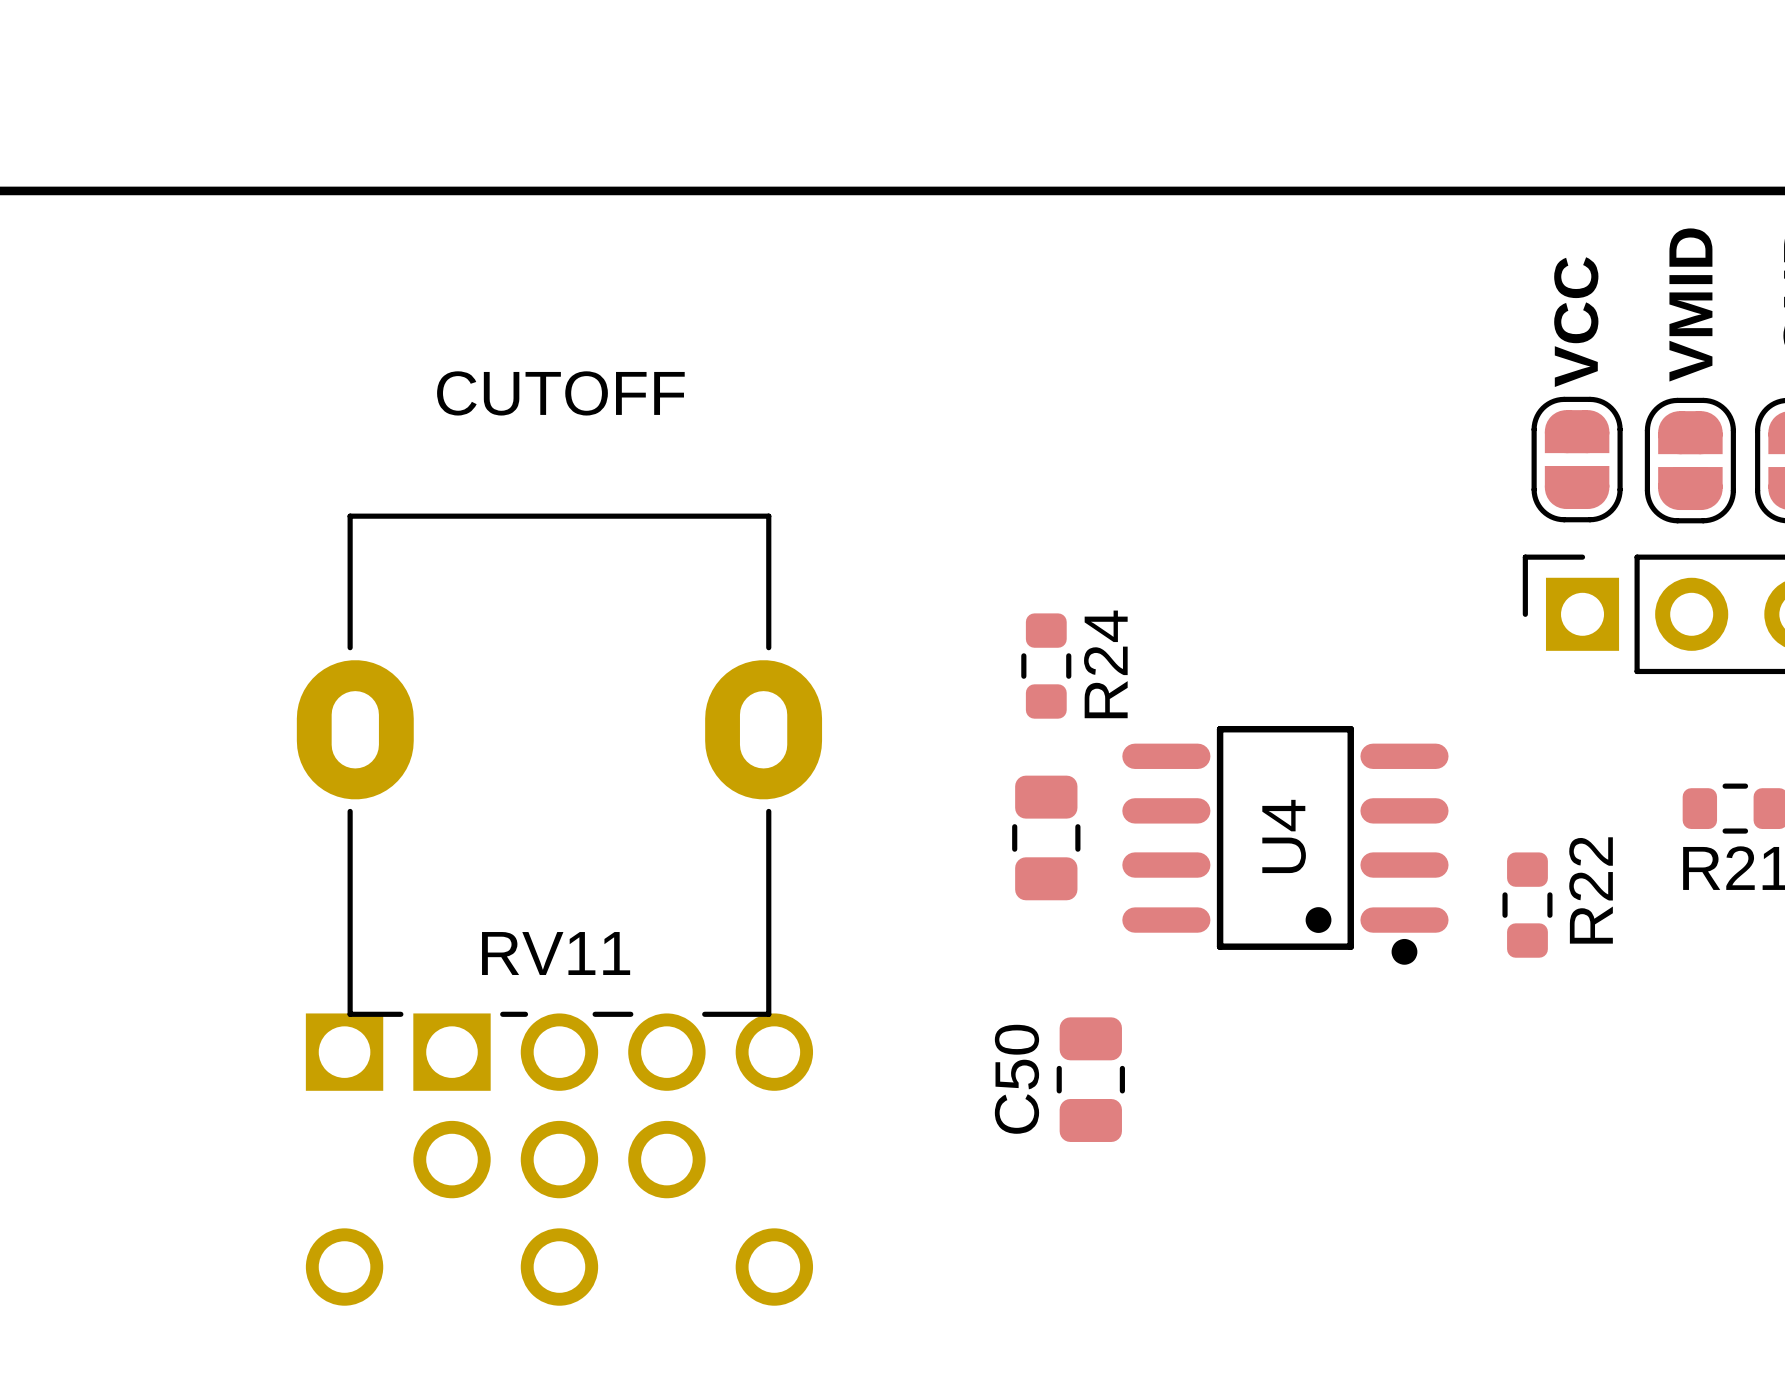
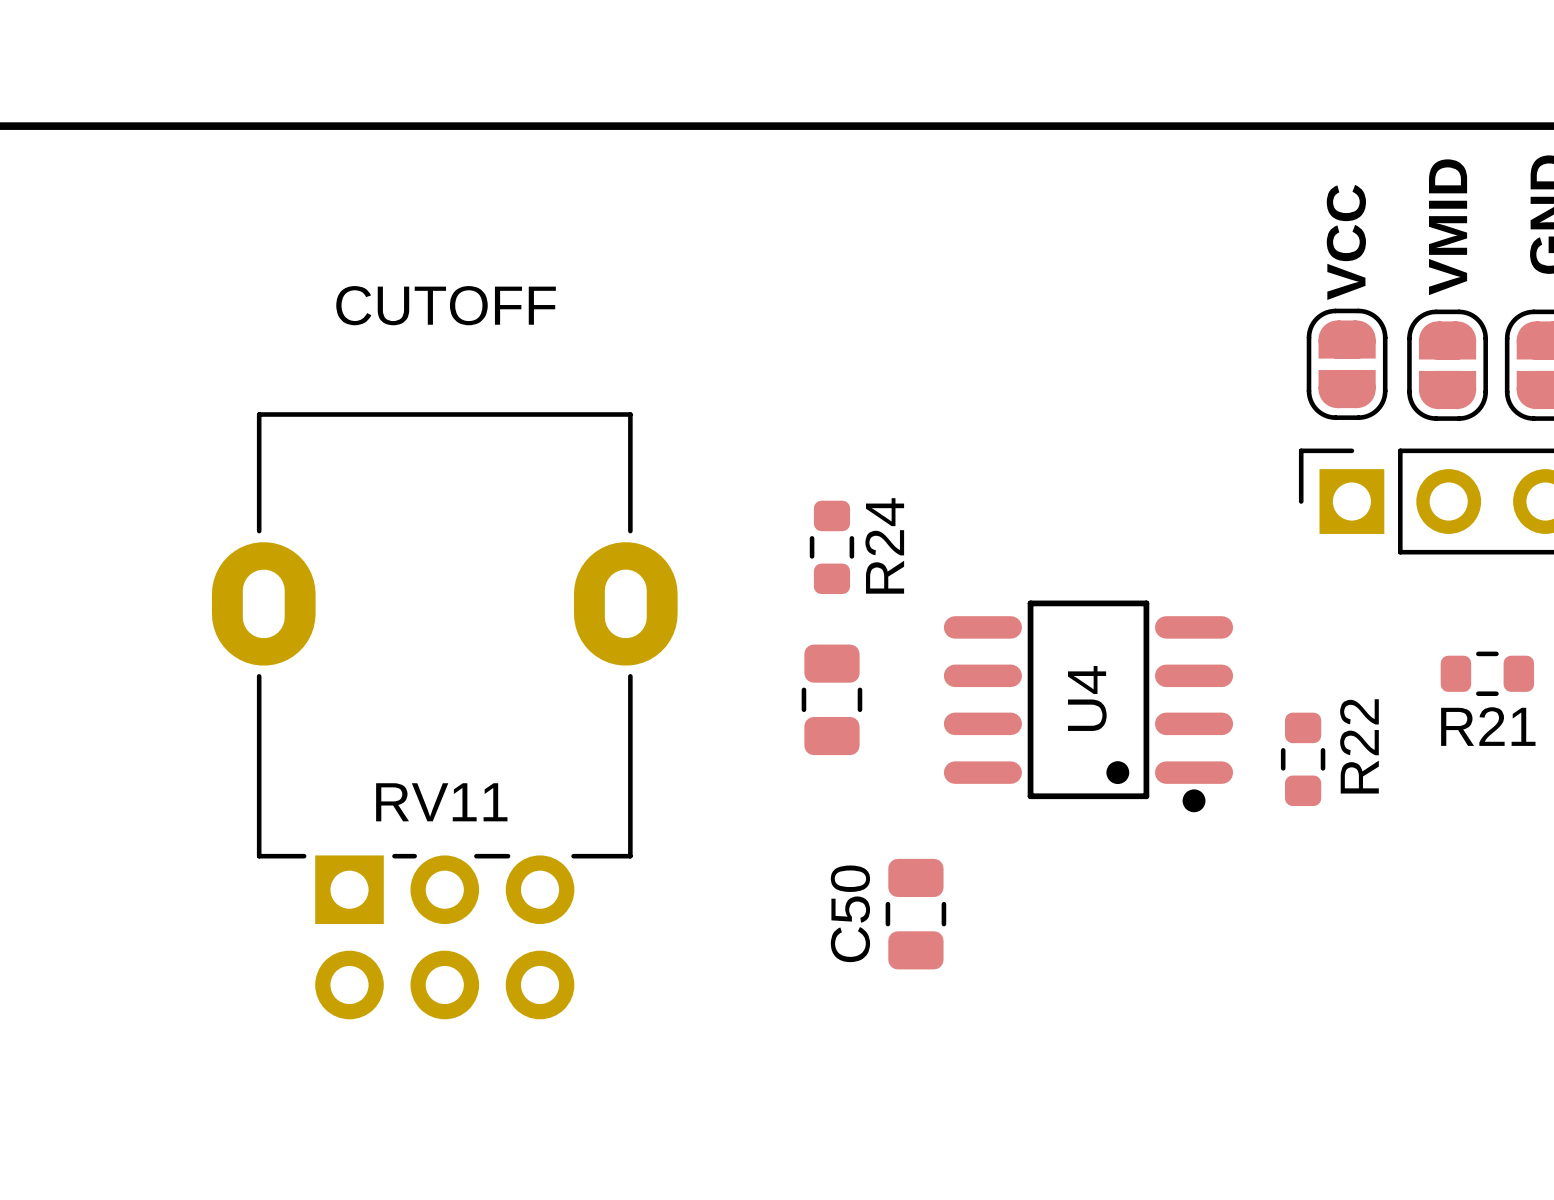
RV11 footprint: [296, 513, 823, 1306] -> [211, 412, 678, 1020]
R24 position: (1046, 666) -> (831, 547)
part position: (1046, 837) -> (831, 699)

